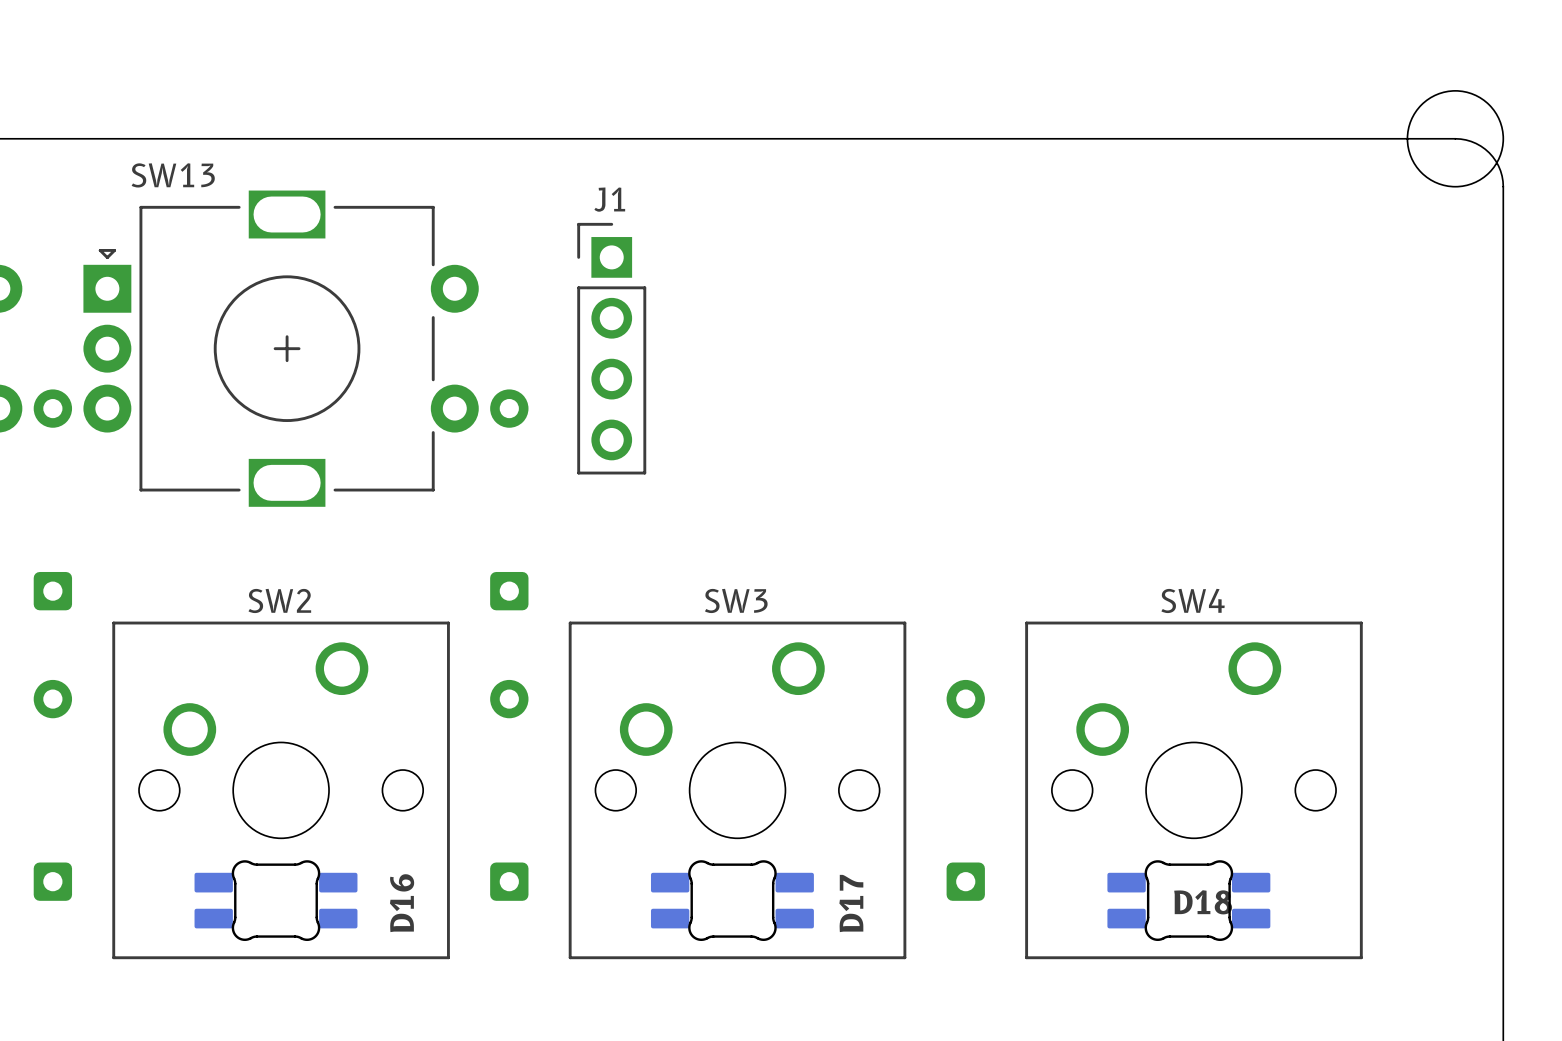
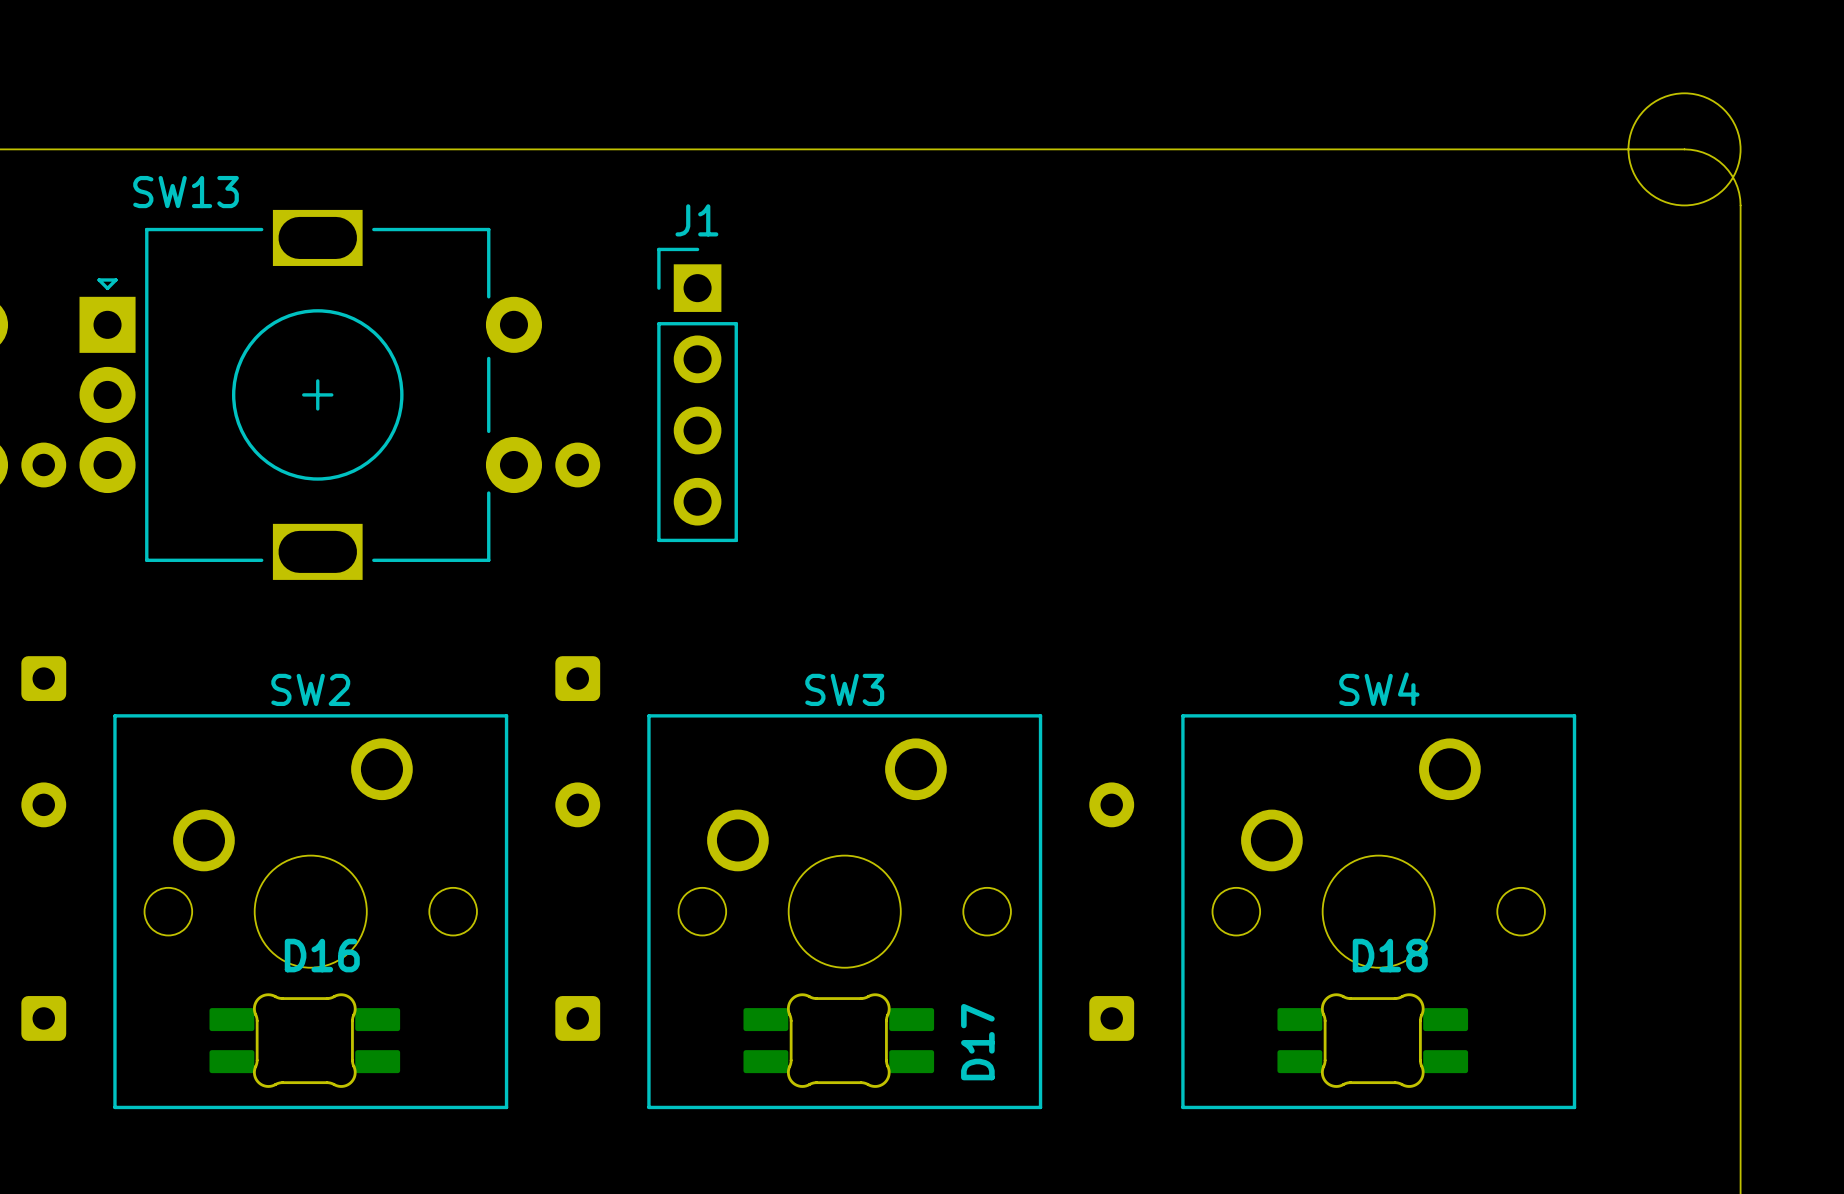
D18 name position: D18 (1203, 902) -> D18 (1390, 955)
D16 name rotation: 0° (402, 903) -> 90° clockwise (322, 955)
D16 name position: D16 (402, 903) -> D16 (322, 955)

